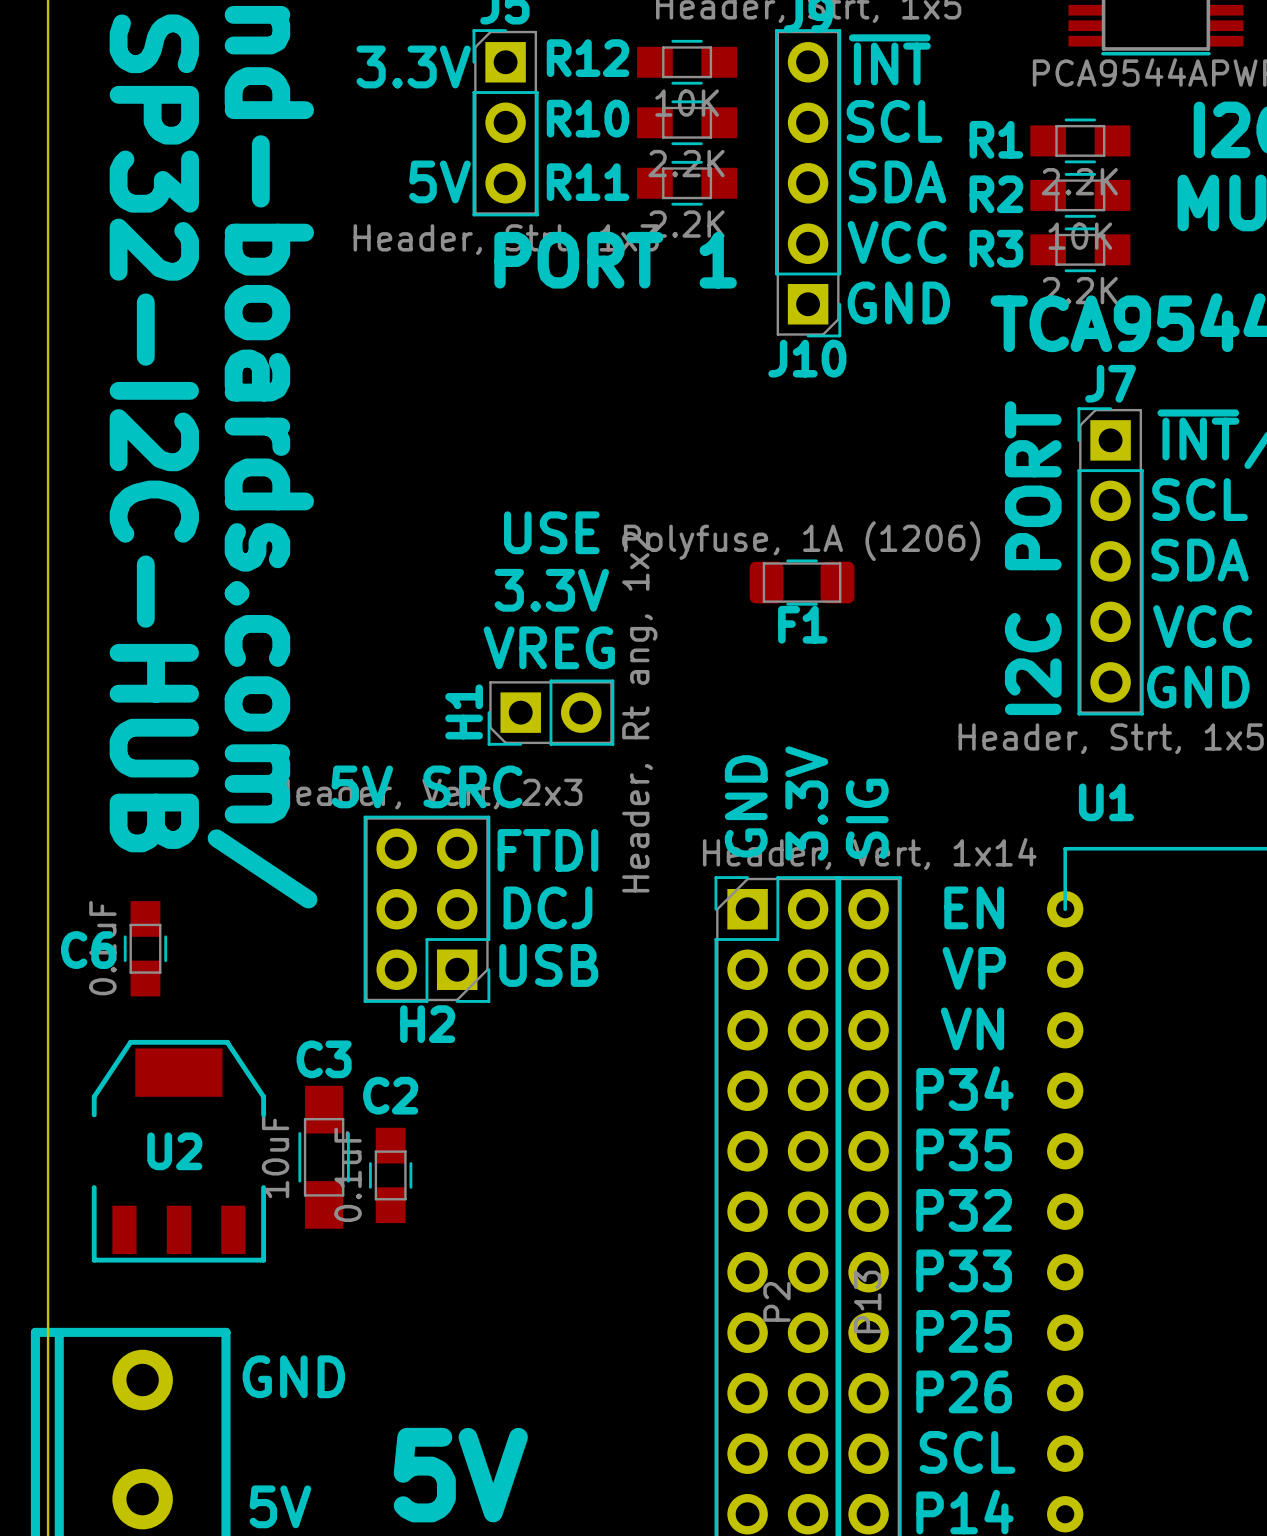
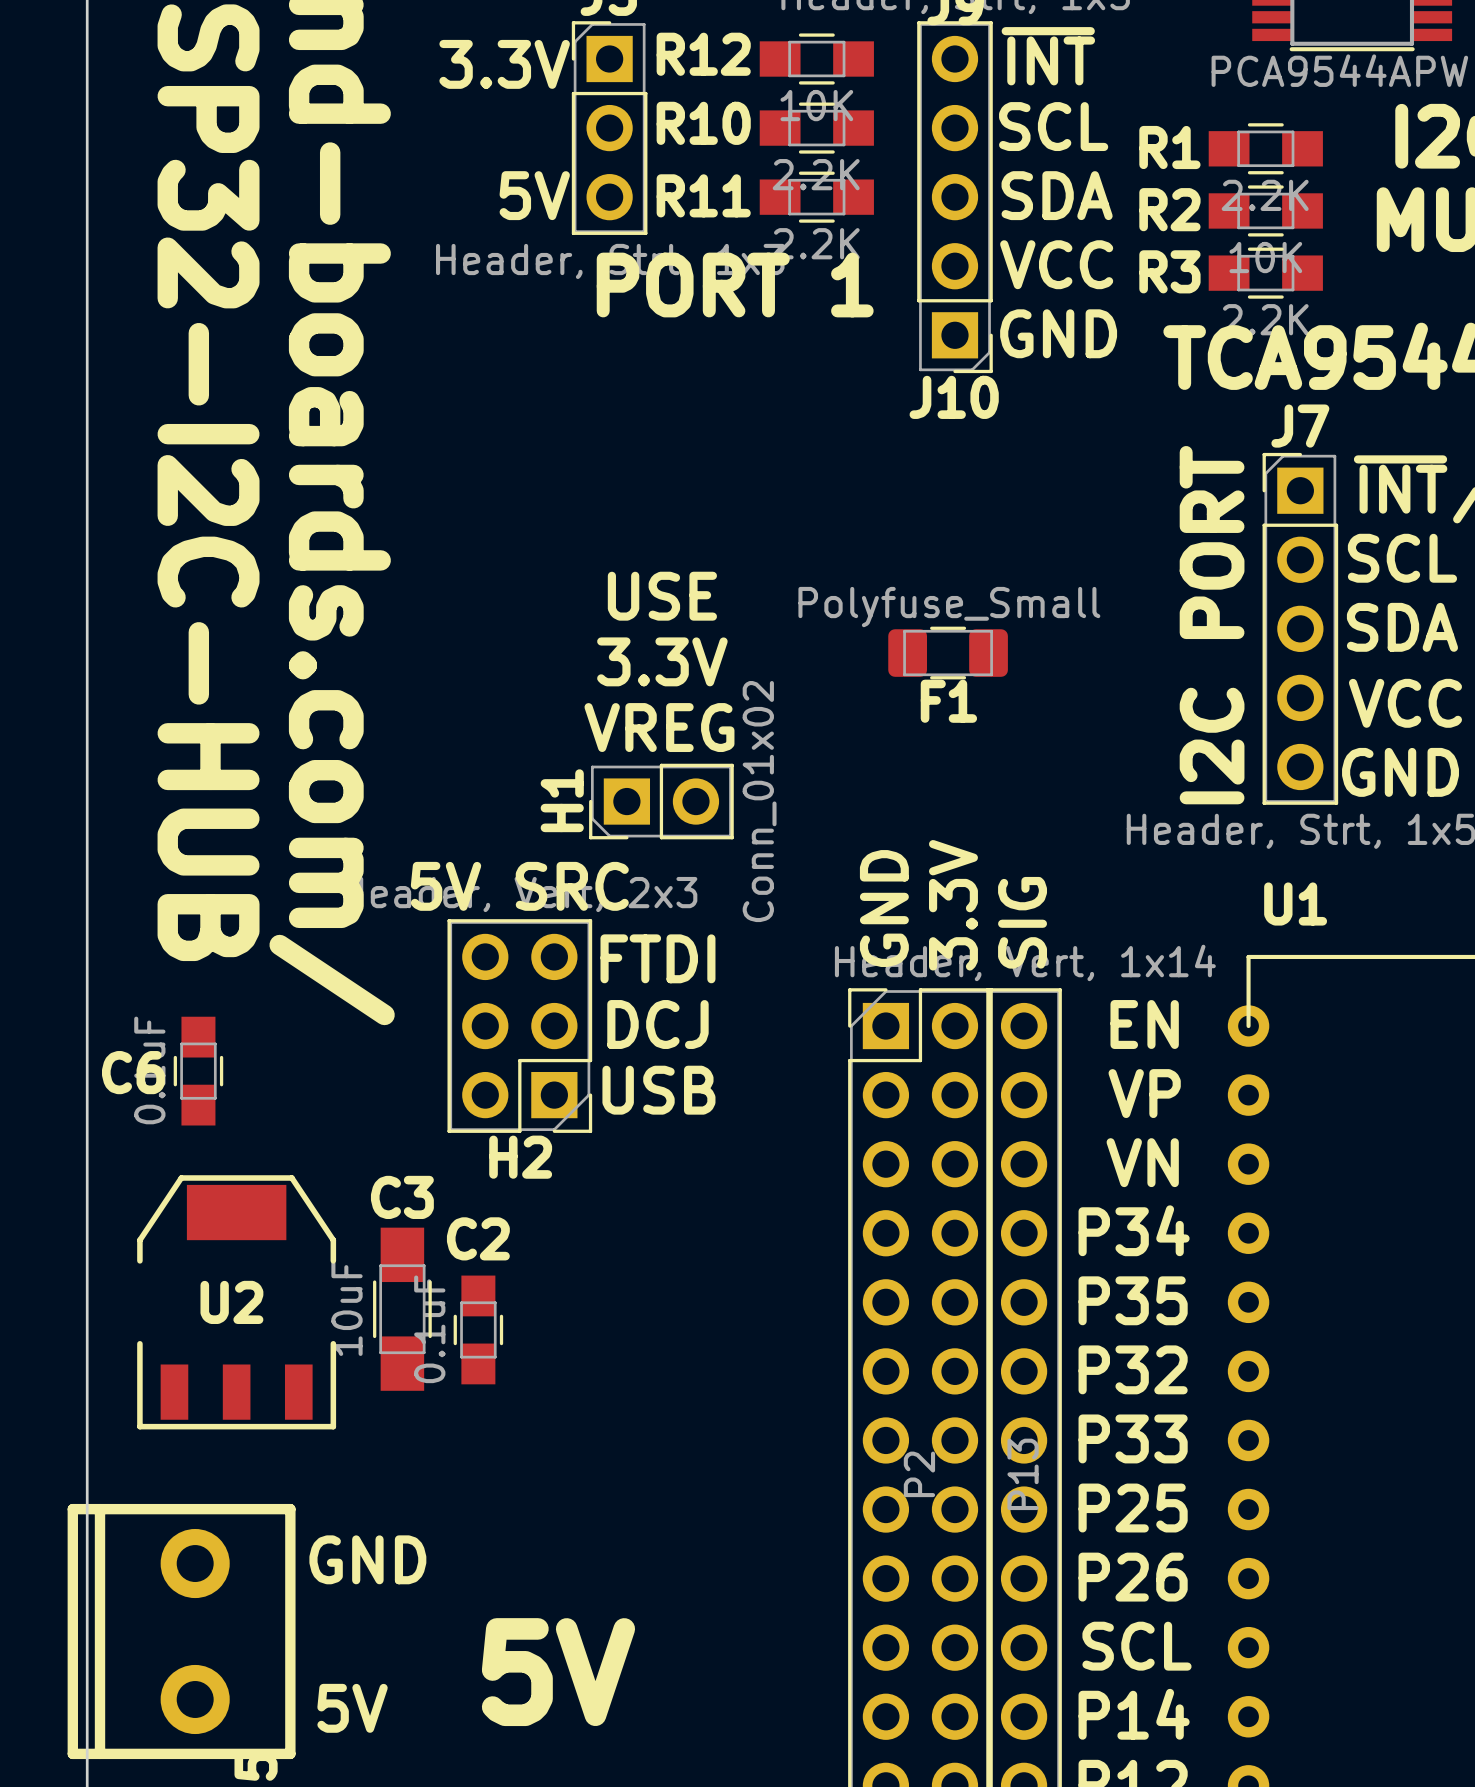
F1 value: Polyfuse, 1A (1206) (802, 541) -> Polyfuse_Small (949, 607)
H1 value: Header, Rt ang, 1x2 (639, 712) -> Conn_01x02 (759, 801)

